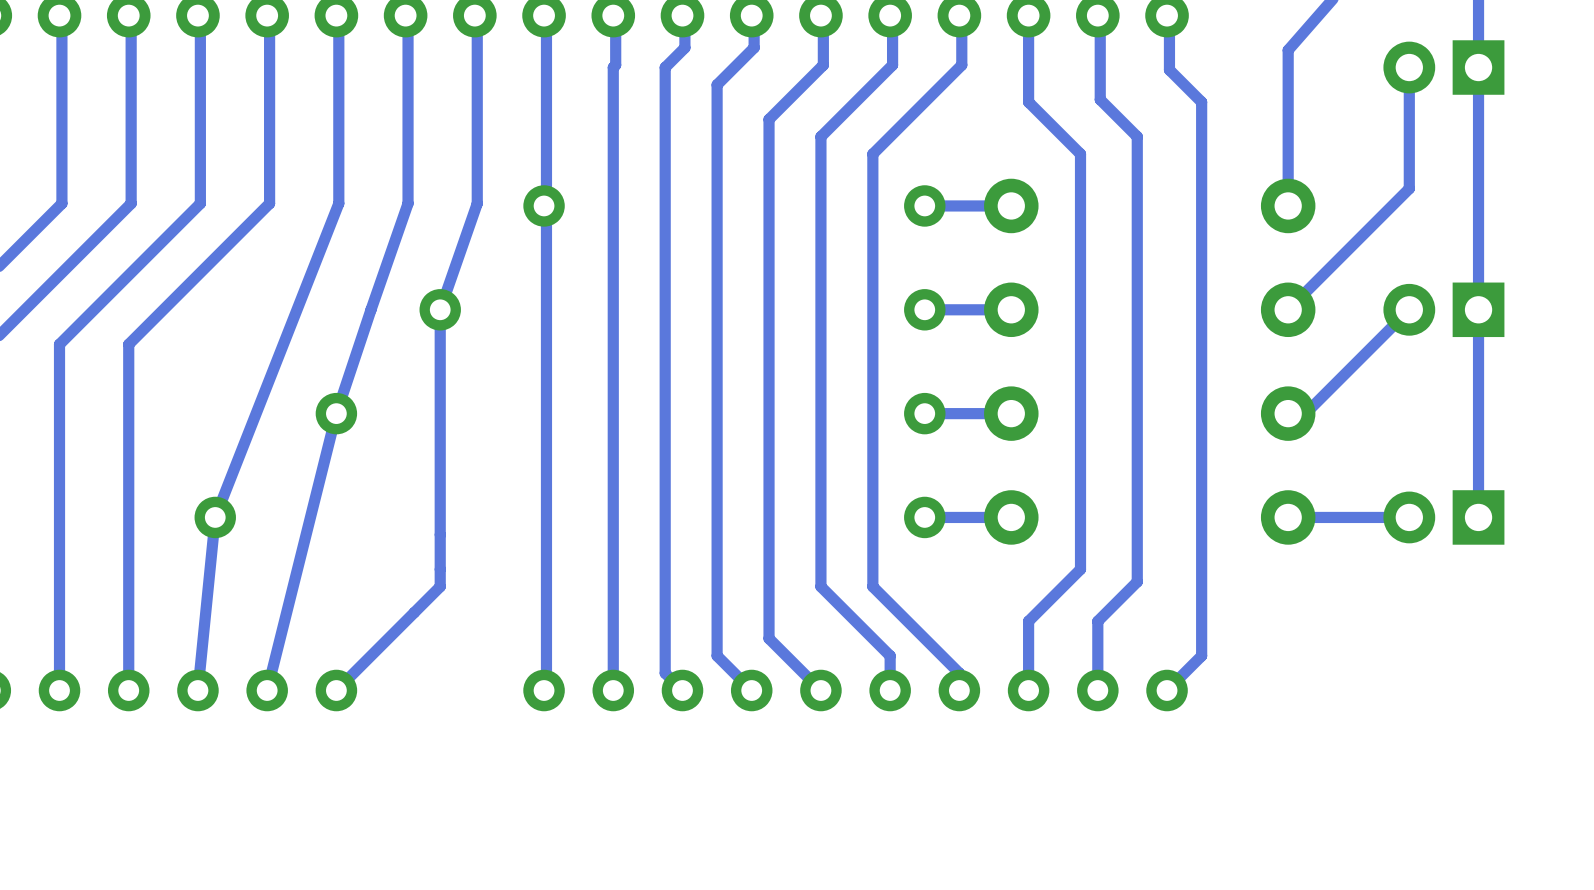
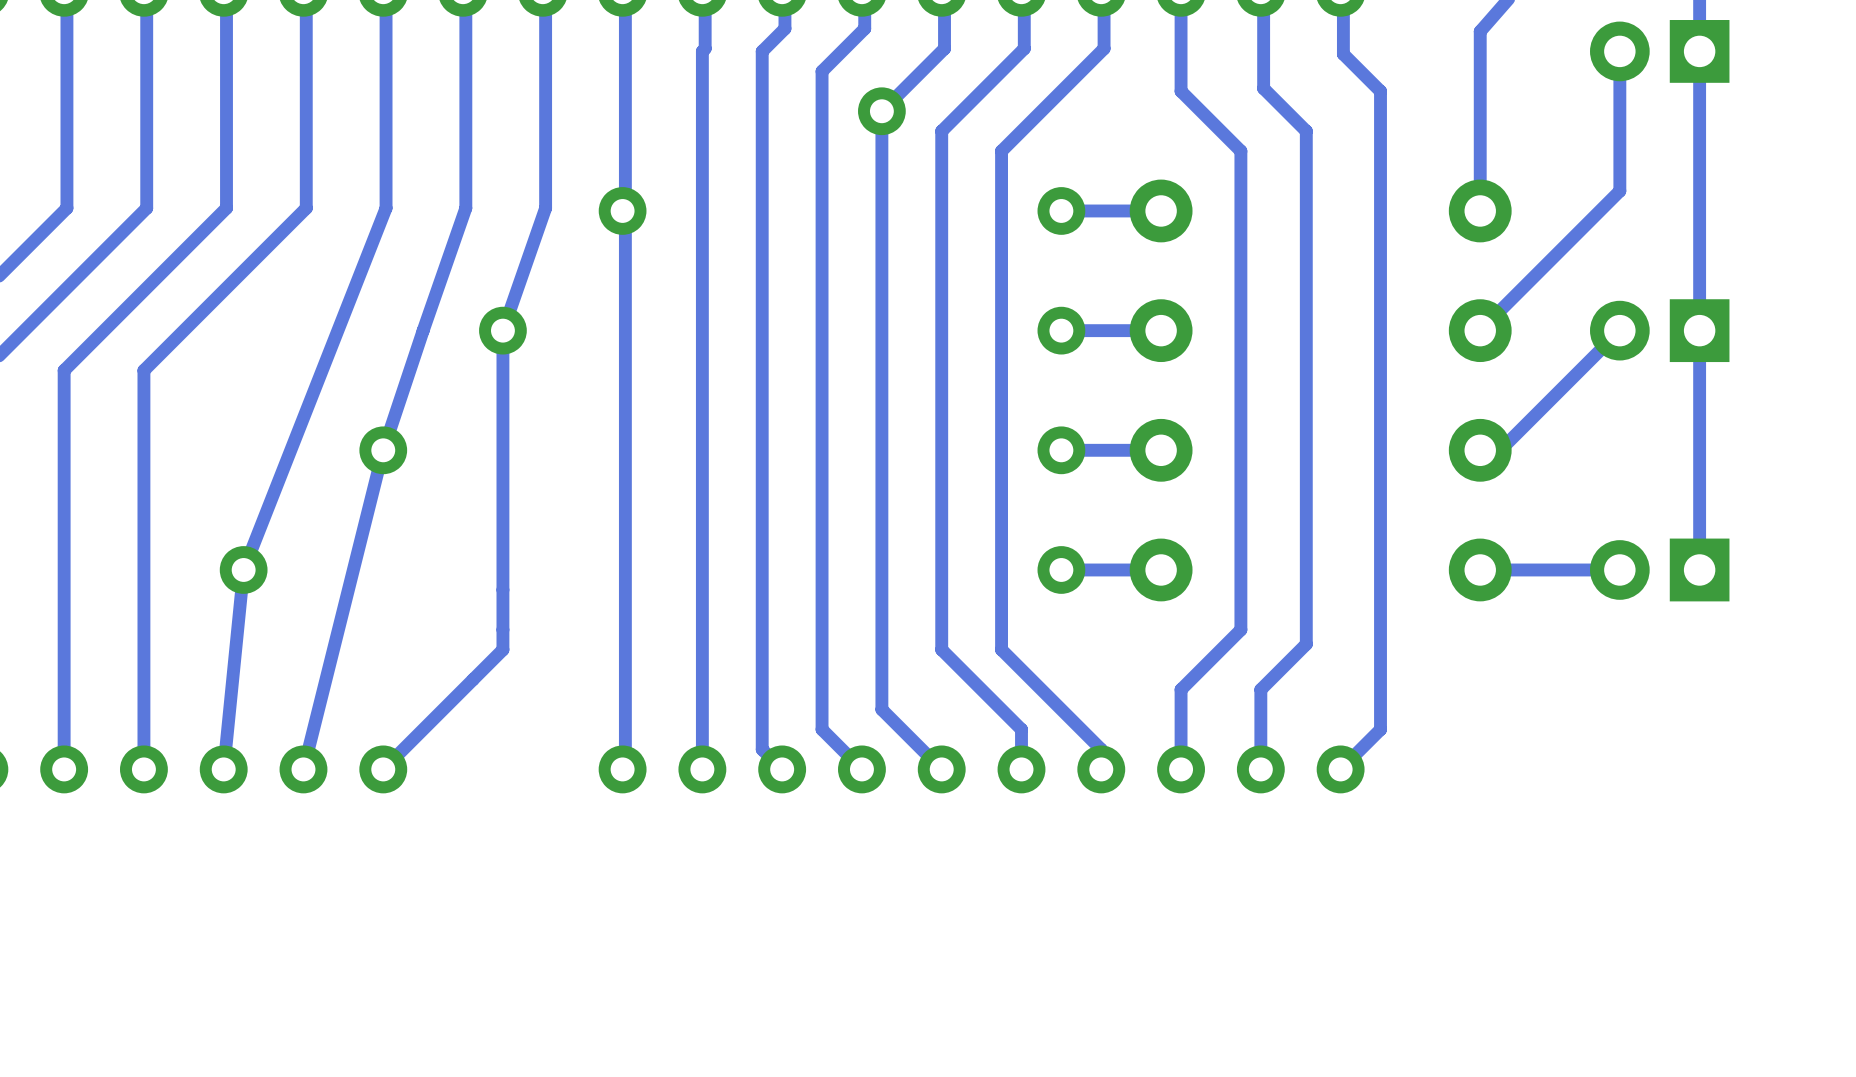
via: none -> (881, 111)

